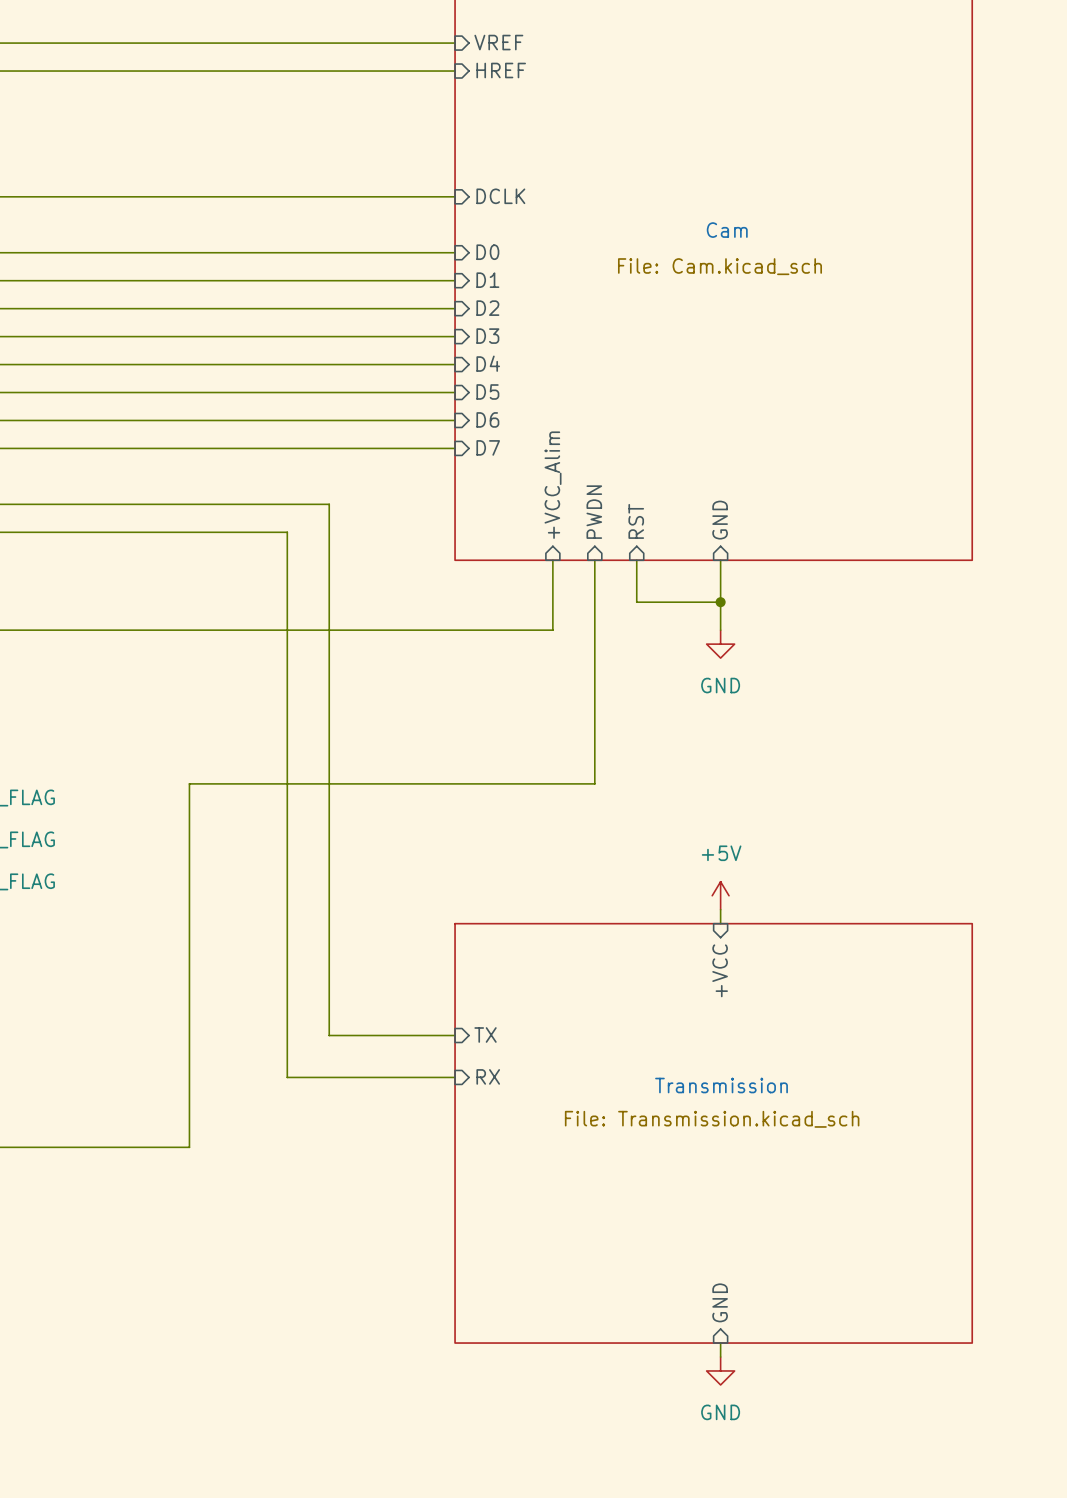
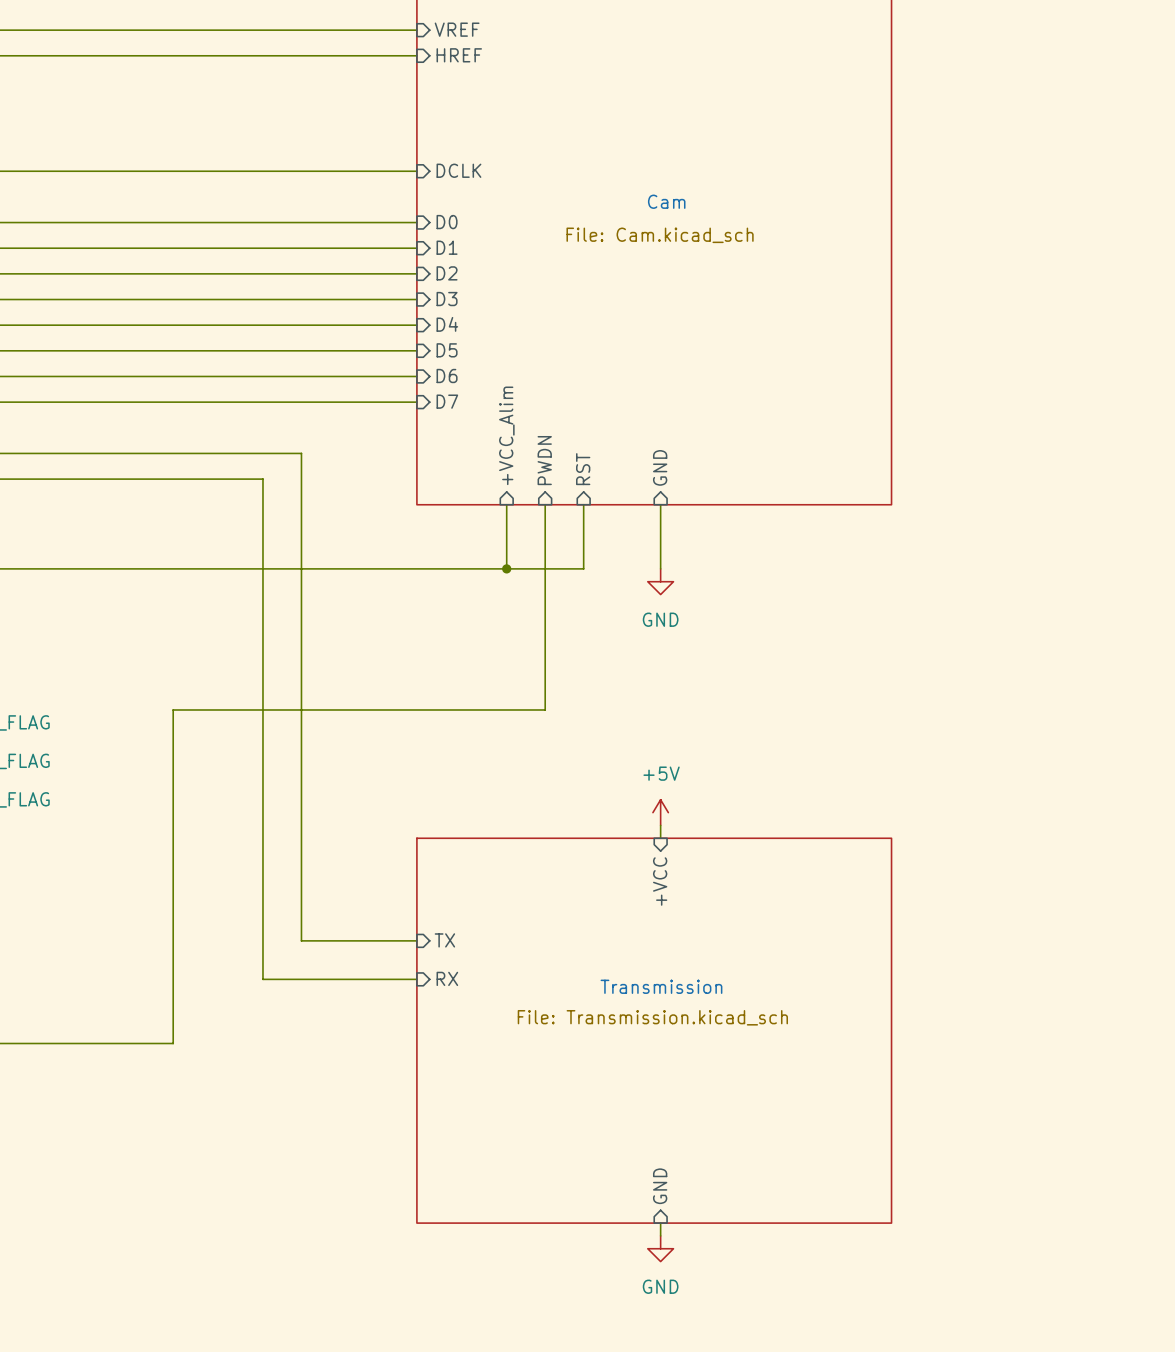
wire: (636, 602) (720, 602) -> (583, 543) (583, 568) (506, 568)
junction: (720, 602) -> none
junction: none -> (506, 568)

